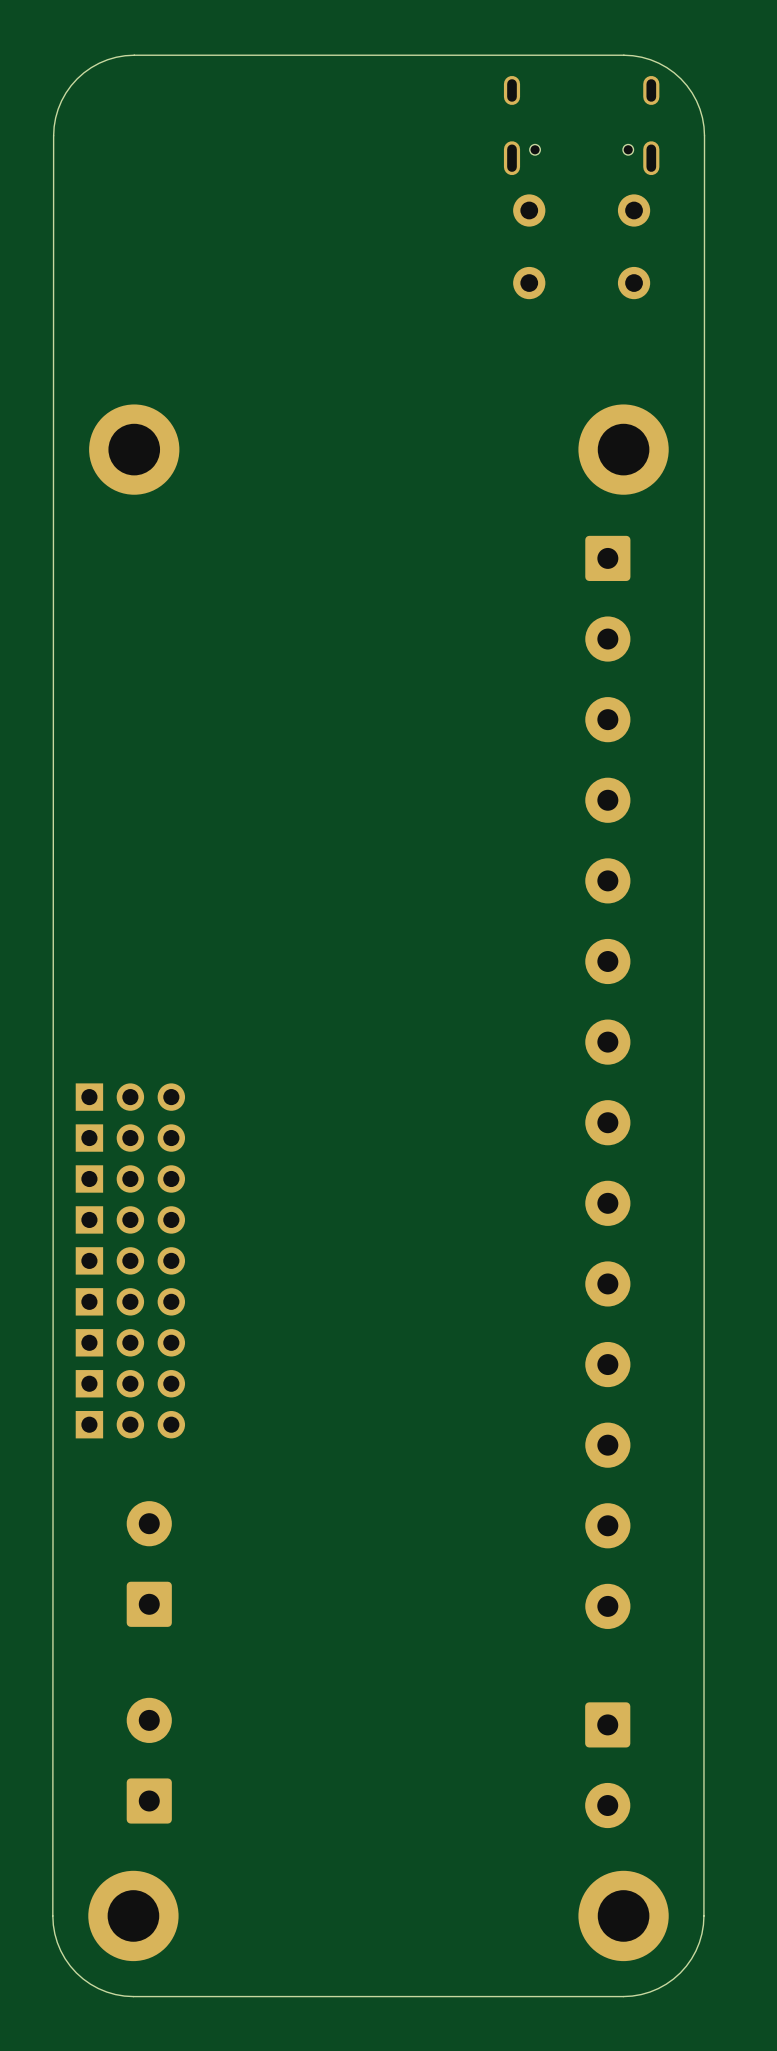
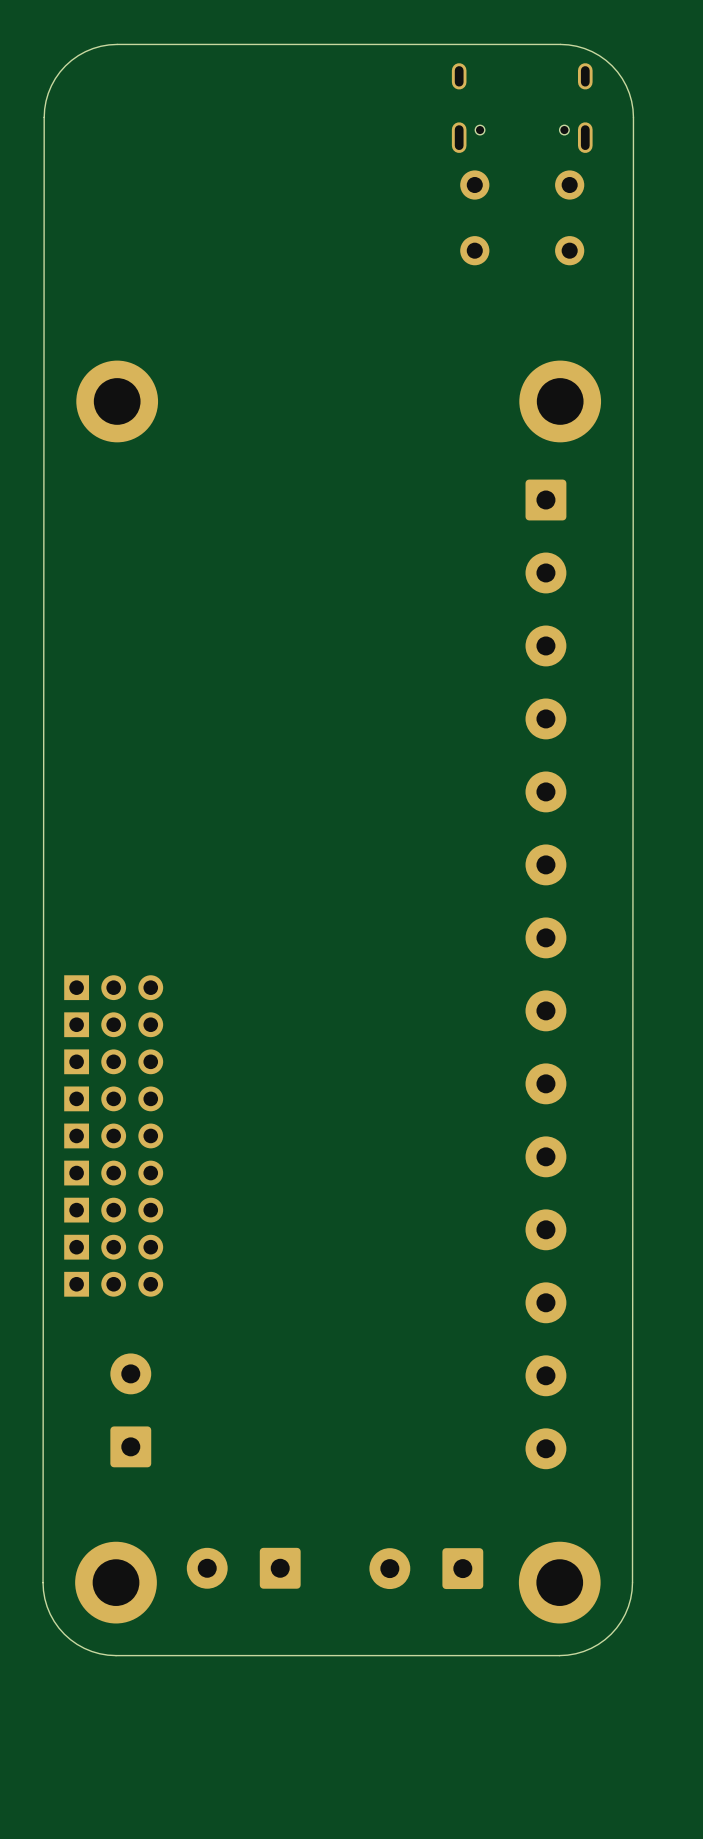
board edge: (704, 135) (703, 1915) (701, 1933) (695, 1950) (680, 1972) (658, 1988) (641, 1994) (623, 1996) (124, 1996) (98, 1988) (83, 1978) (65, 1958) (57, 1942) (52, 1915) (53, 135) -> (633, 117) (632, 1582) (628, 1606) (621, 1621) (611, 1634) (598, 1644) (583, 1651) (559, 1655) (107, 1655) (84, 1648) (70, 1639) (58, 1628) (47, 1606) (43, 1582) (44, 117)
part rotation: 0° (149, 1760) -> 90° counterclockwise (243, 1568)
part position: (149, 1760) -> (243, 1568)
part rotation: 0° (607, 1765) -> 90° clockwise (426, 1568)
part position: (607, 1765) -> (426, 1568)
part position: (133, 1915) -> (116, 1582)
part position: (623, 1915) -> (559, 1582)

